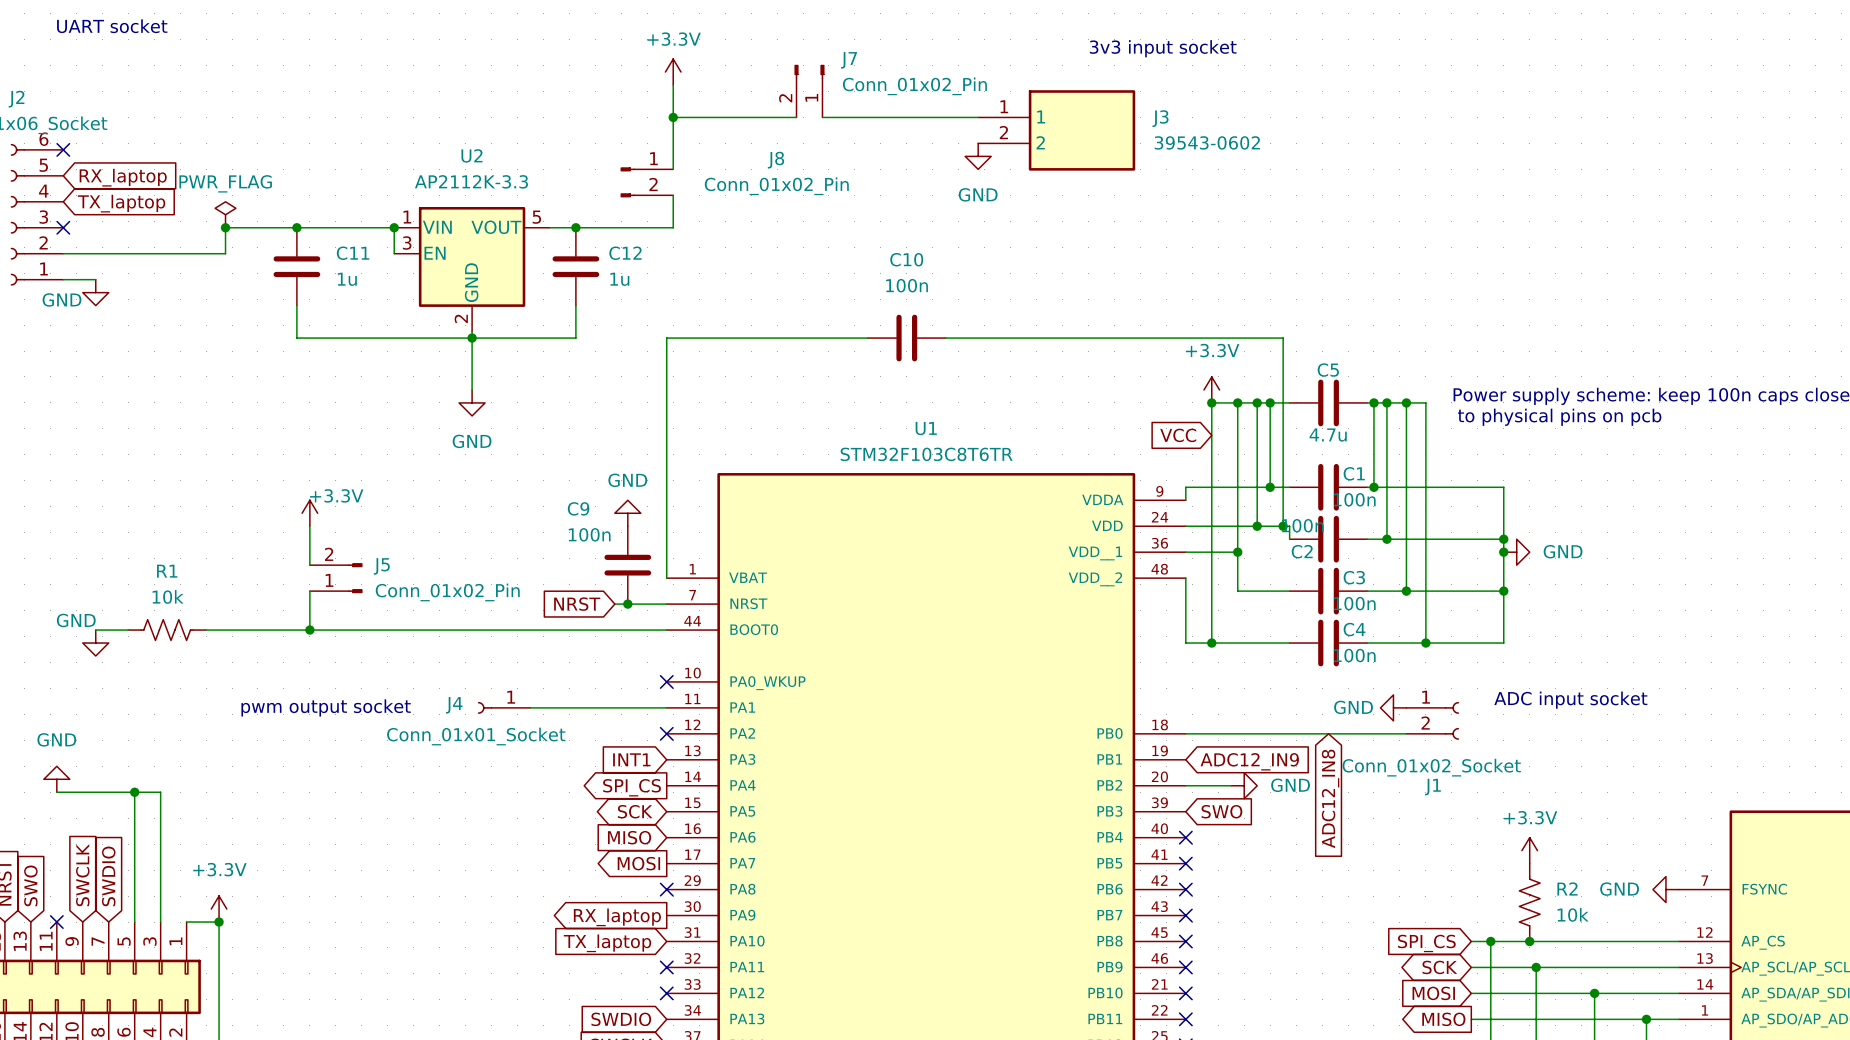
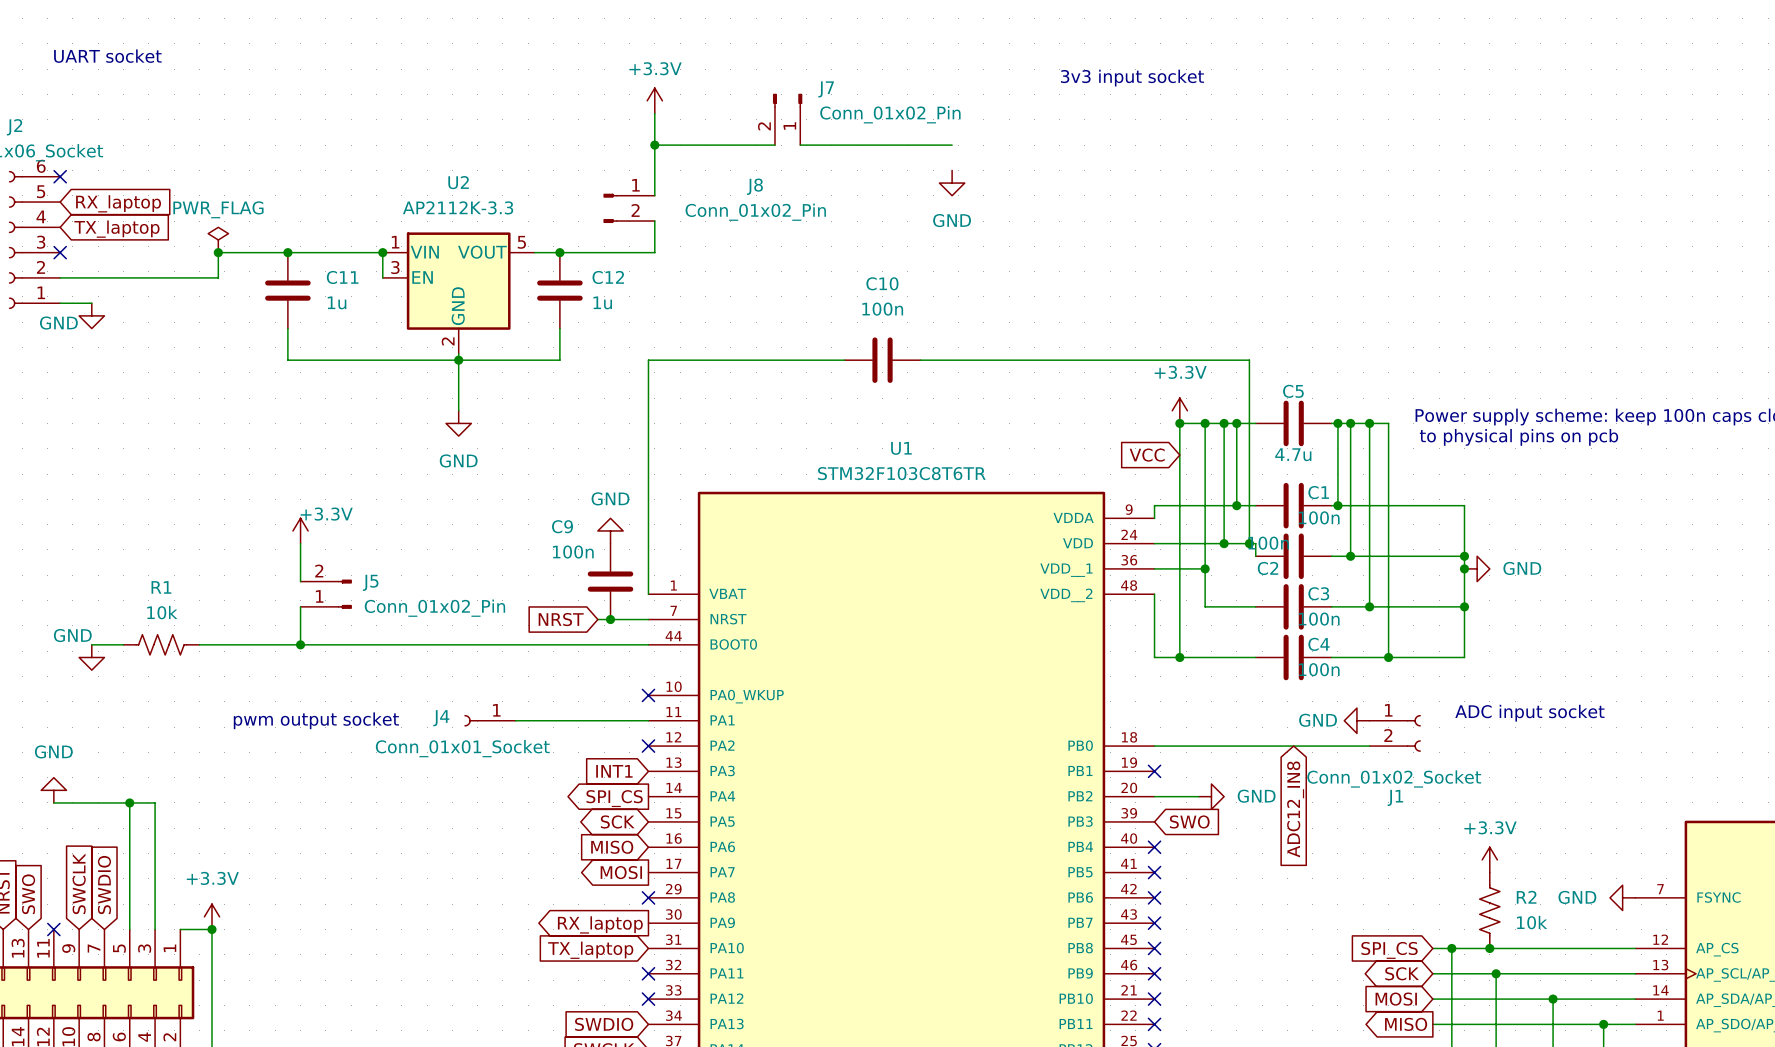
J3: 39543-0602 (1056, 130) -> none
no-connect mark: none -> (1154, 771)
global label: ADC12_IN9 (1249, 761) -> none

